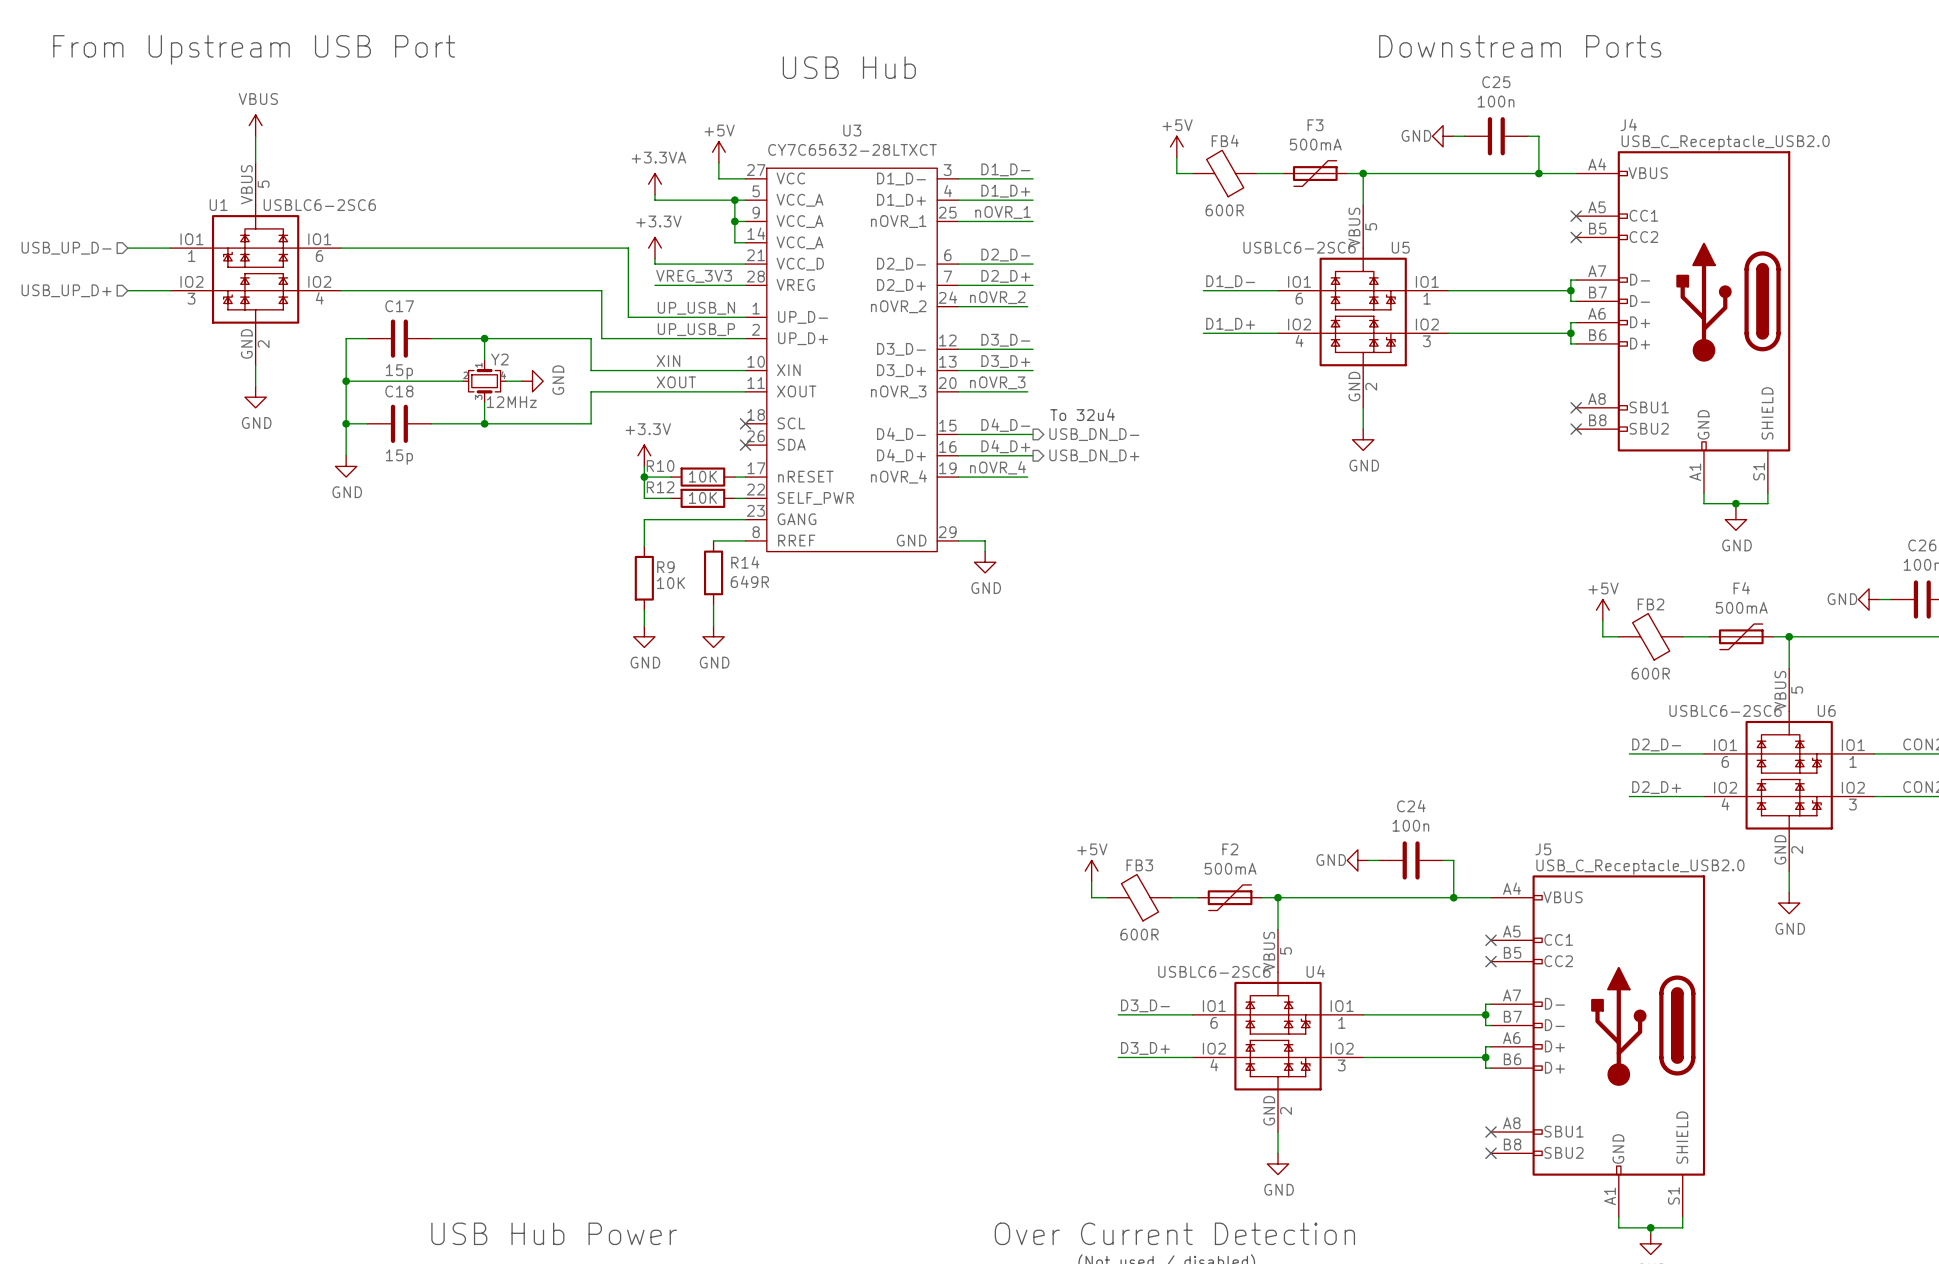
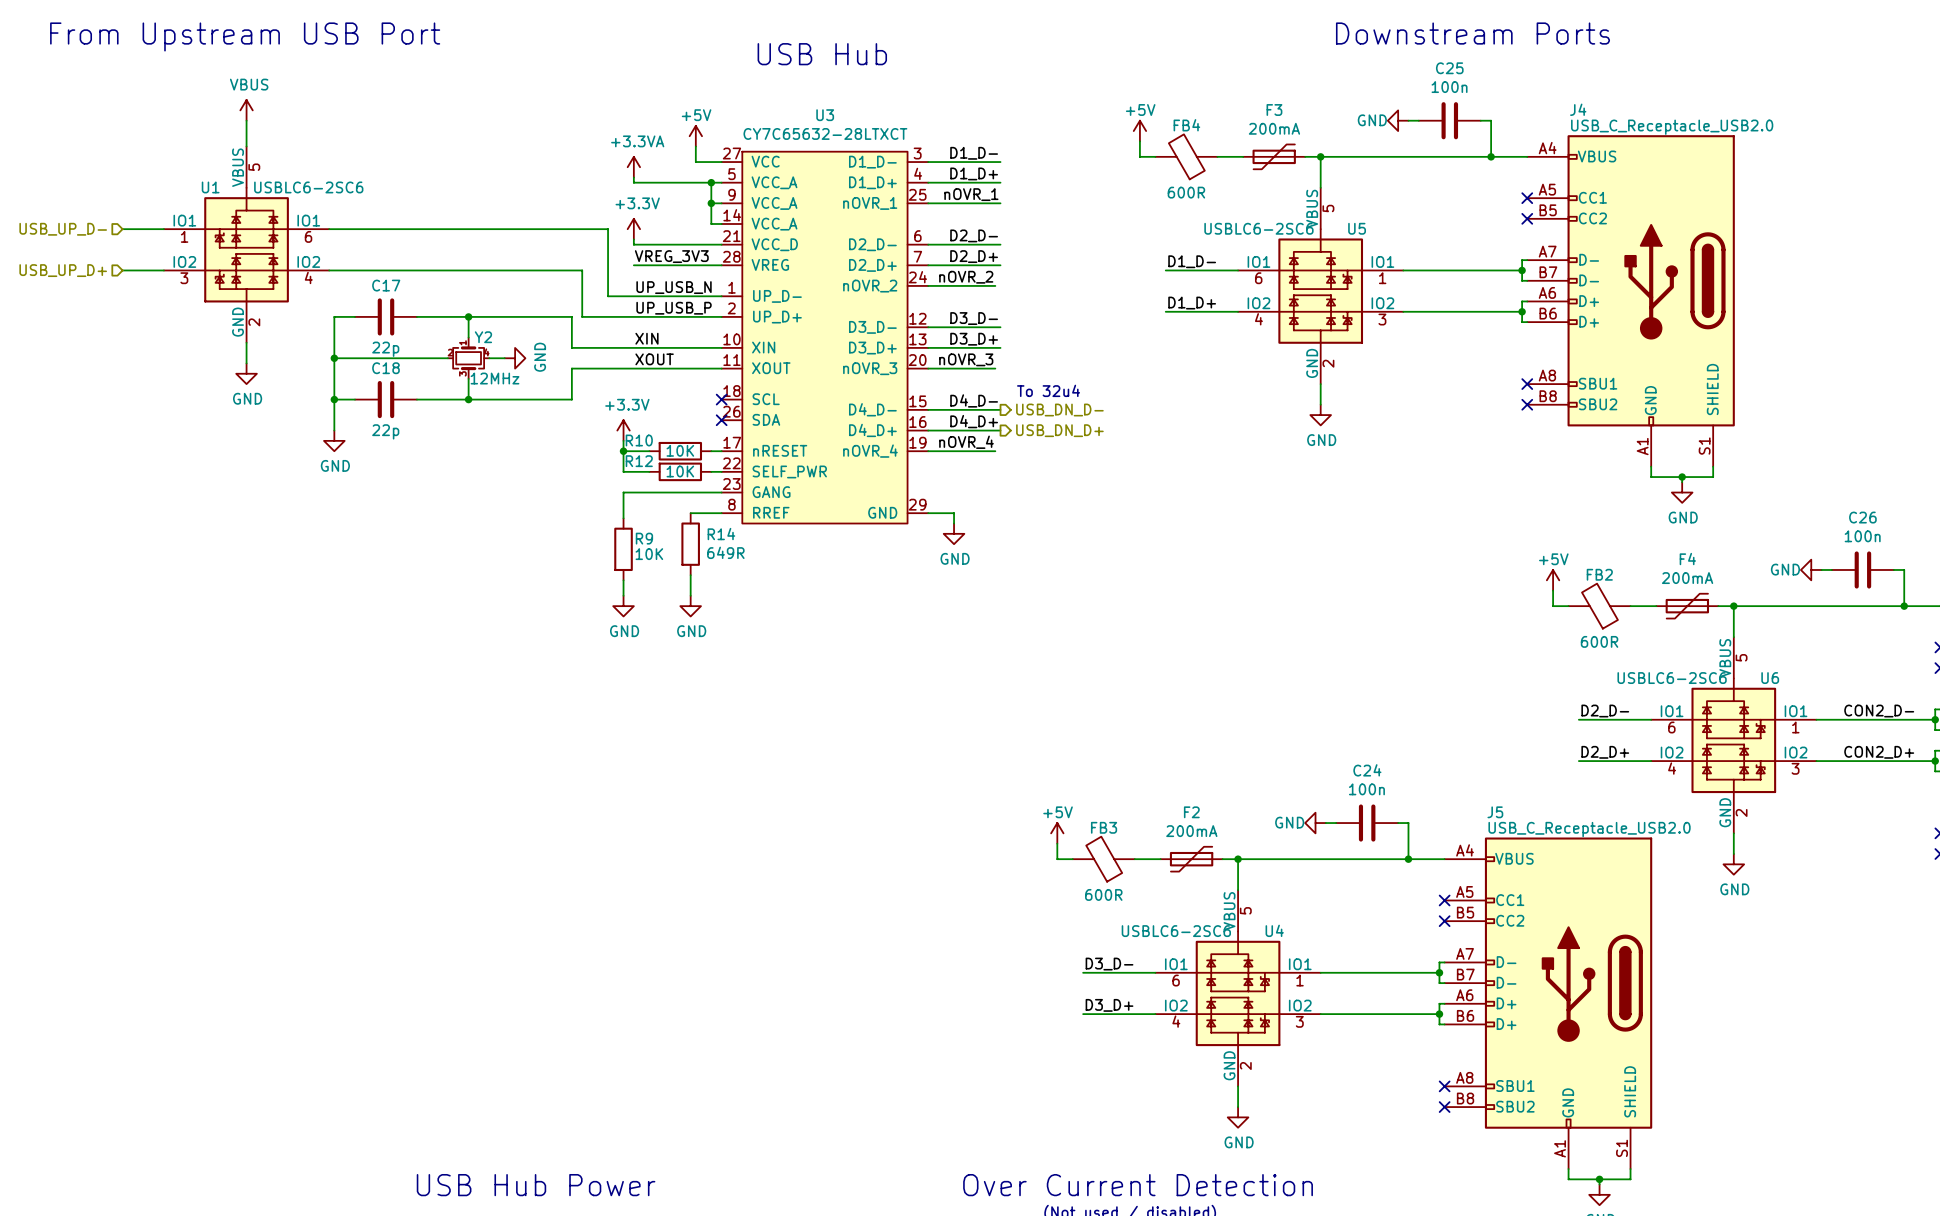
F3 value: 500mA (1315, 144) -> 200mA (1274, 128)
C17 value: 15p (399, 371) -> 22p (385, 349)
C18 value: 15p (399, 457) -> 22p (385, 431)
F4 value: 500mA (1741, 607) -> 200mA (1687, 578)
F2 value: 500mA (1230, 868) -> 200mA (1191, 831)

